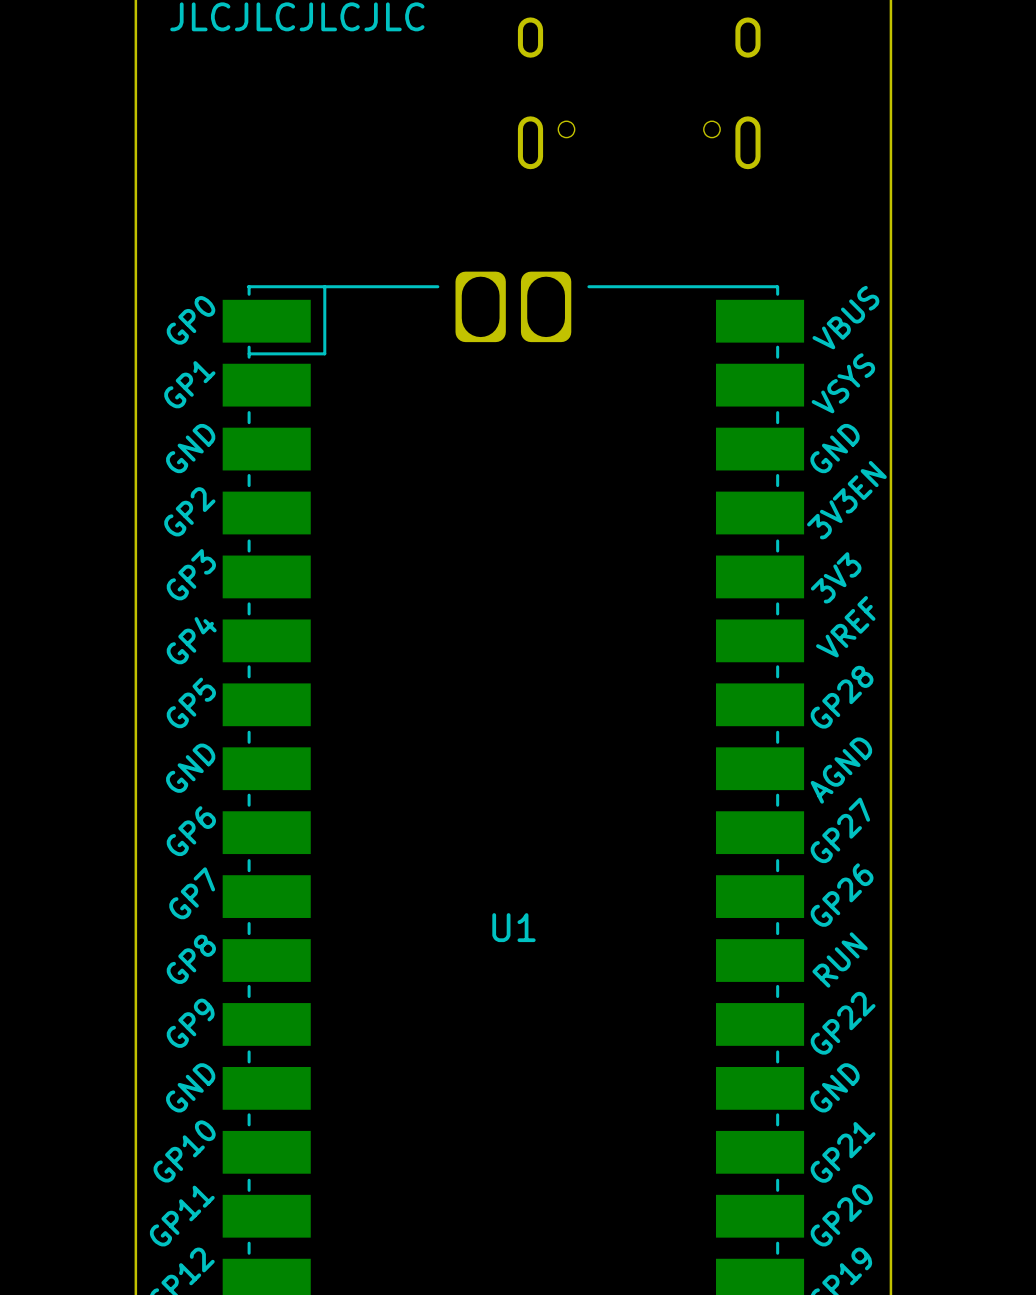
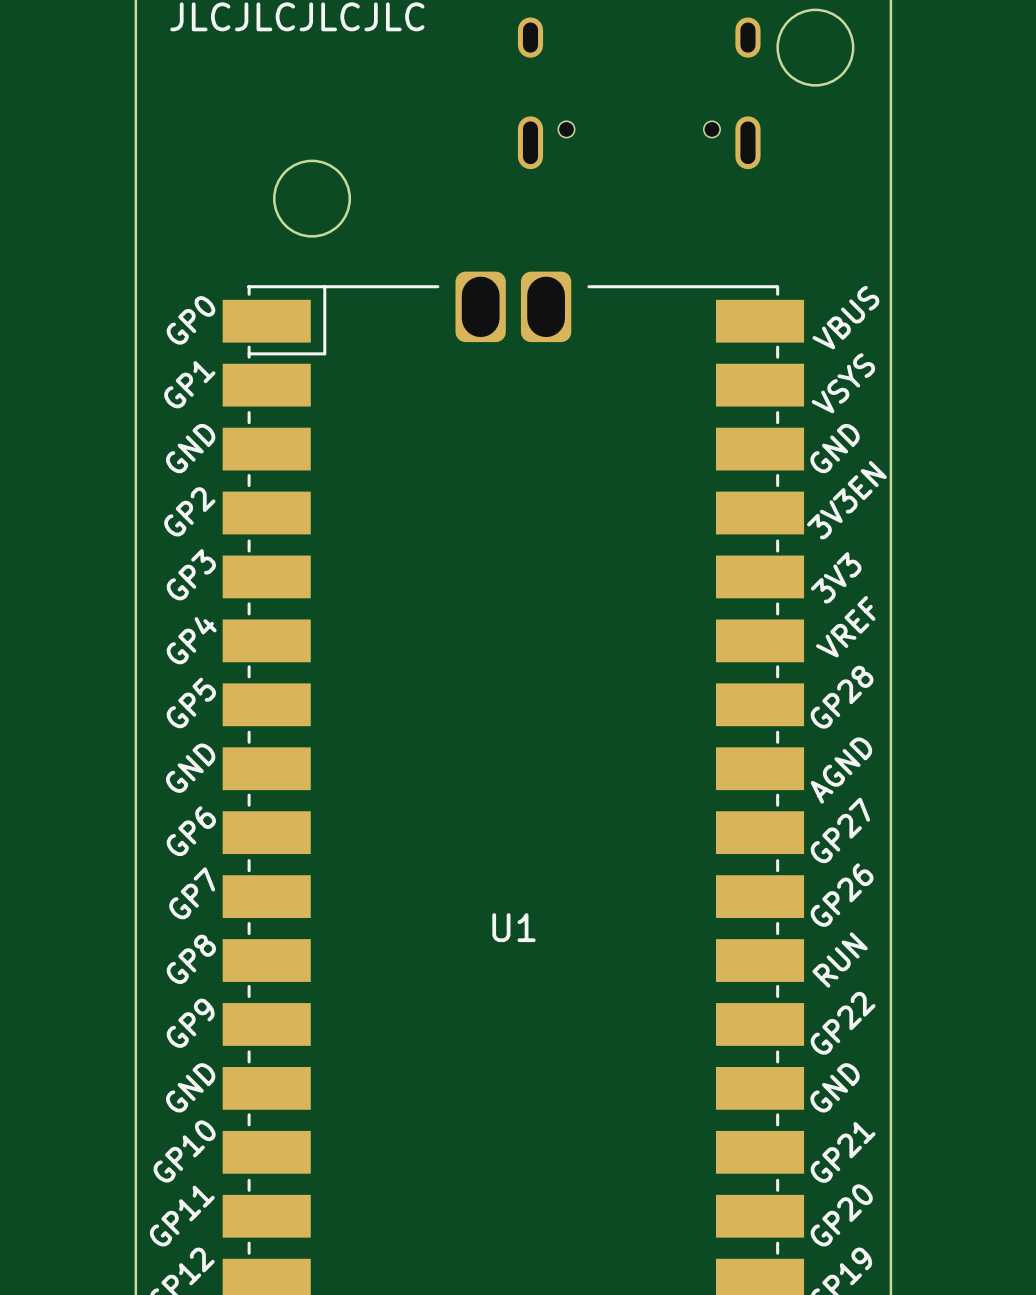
round board edge: none -> [776, 8, 855, 87]
round board edge: none -> [273, 159, 352, 238]

